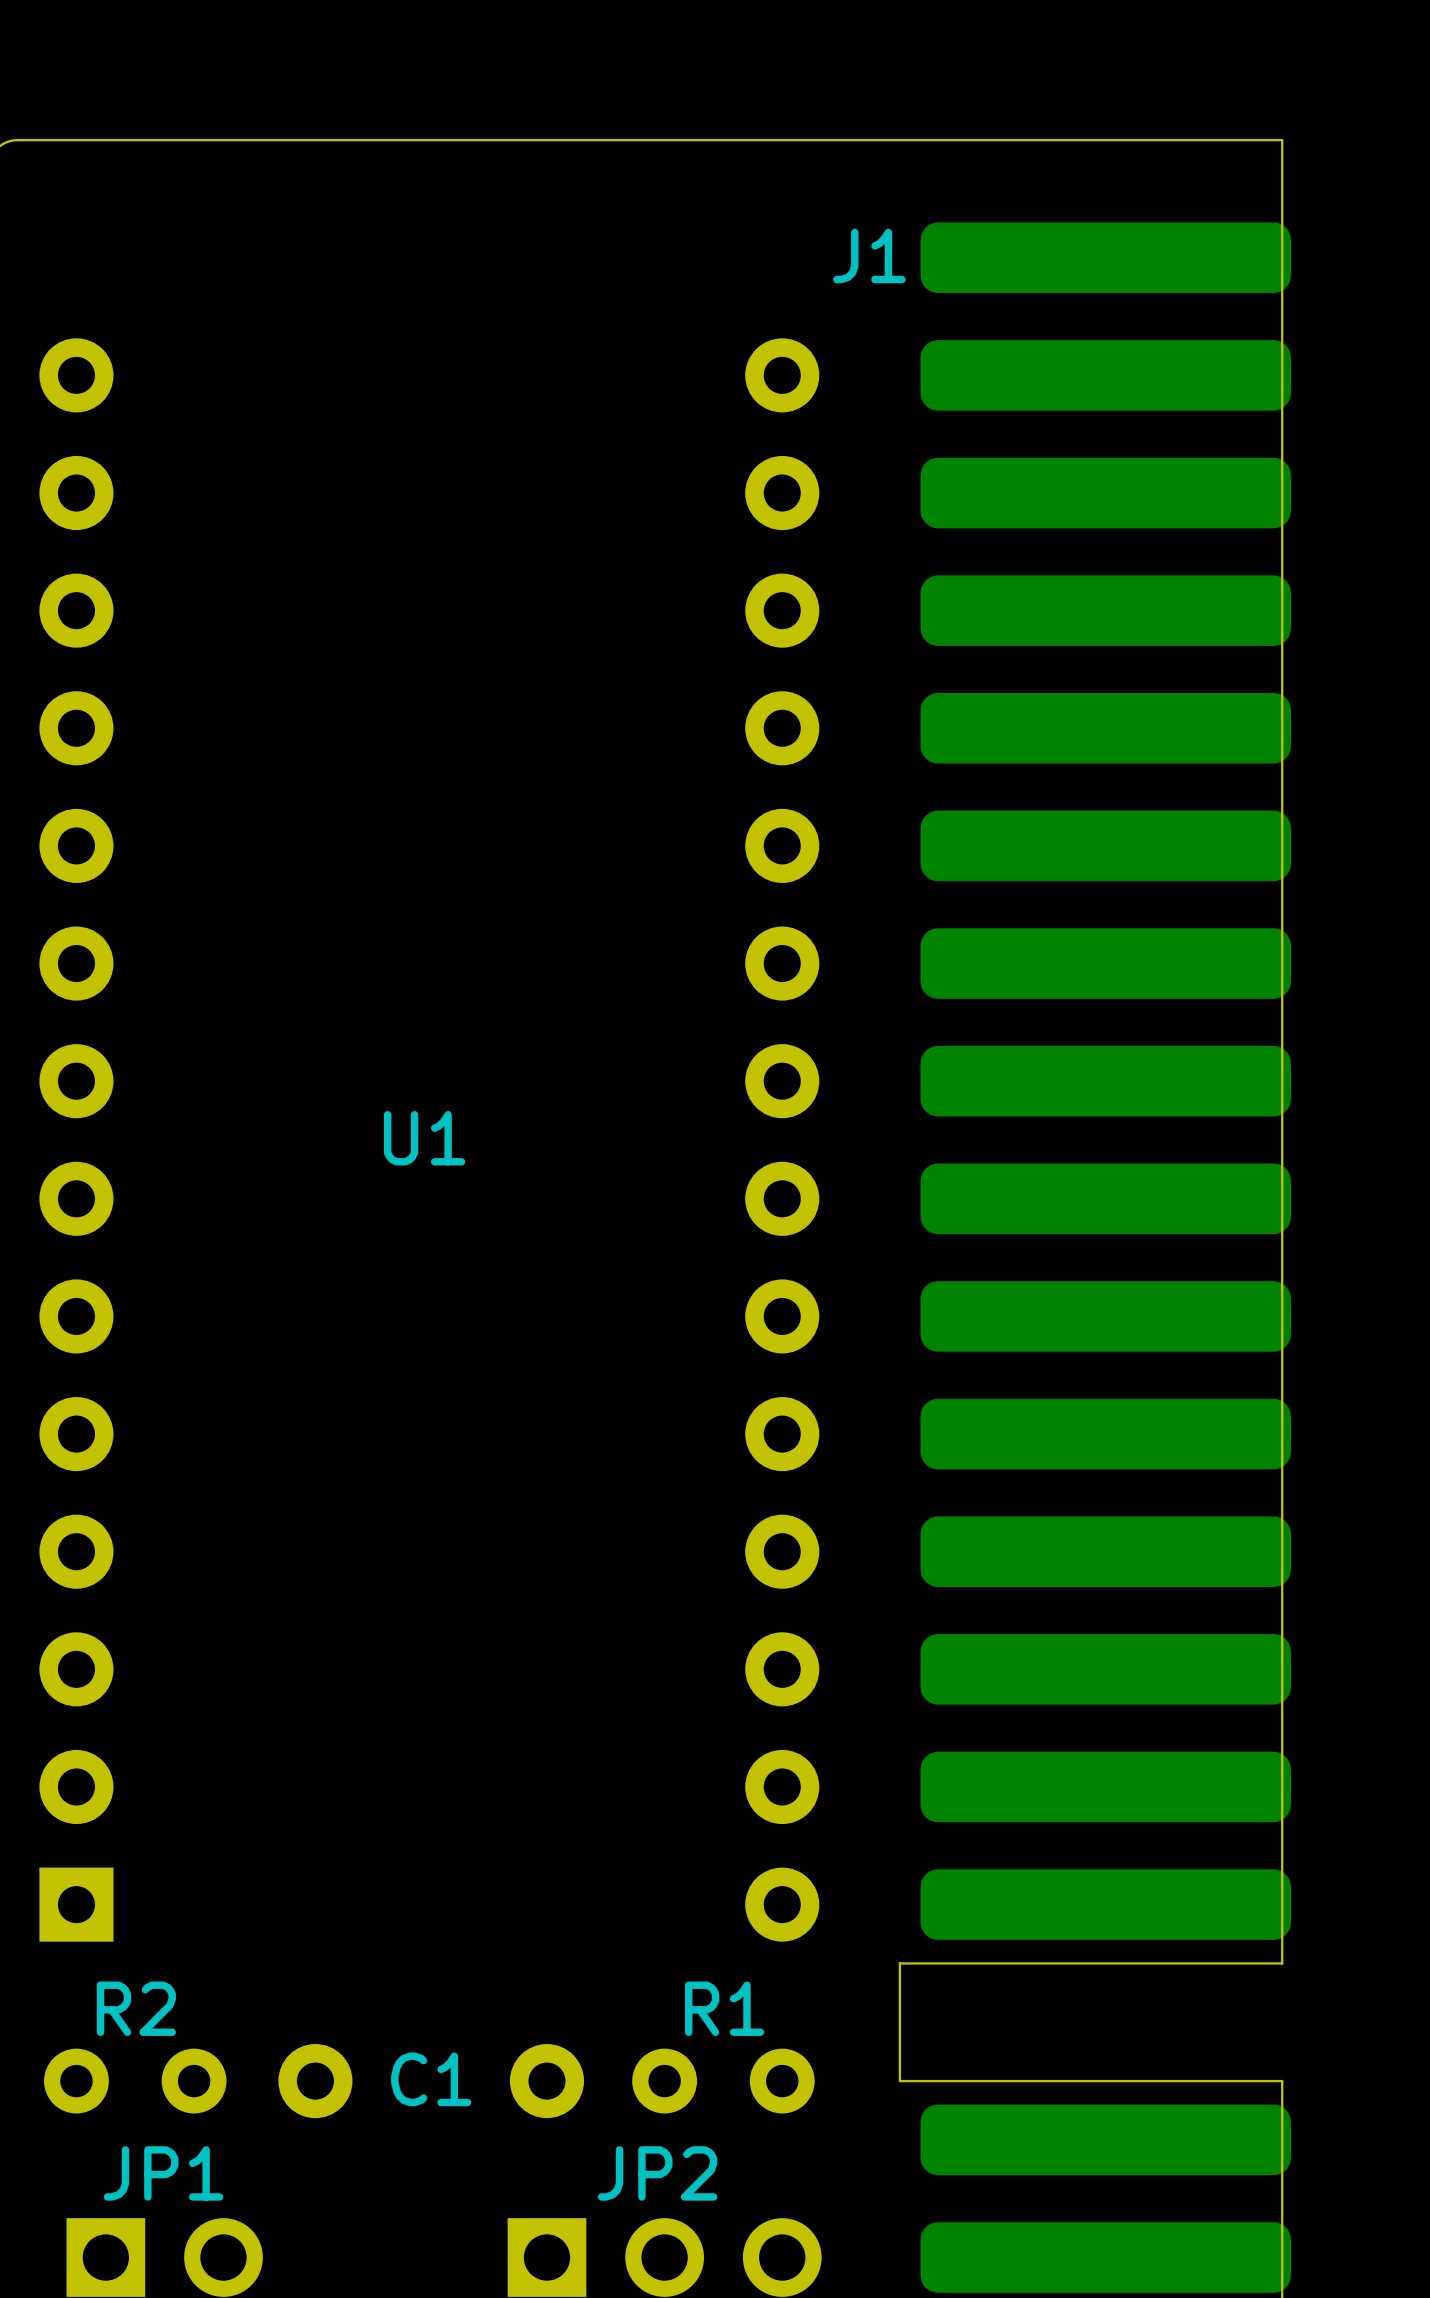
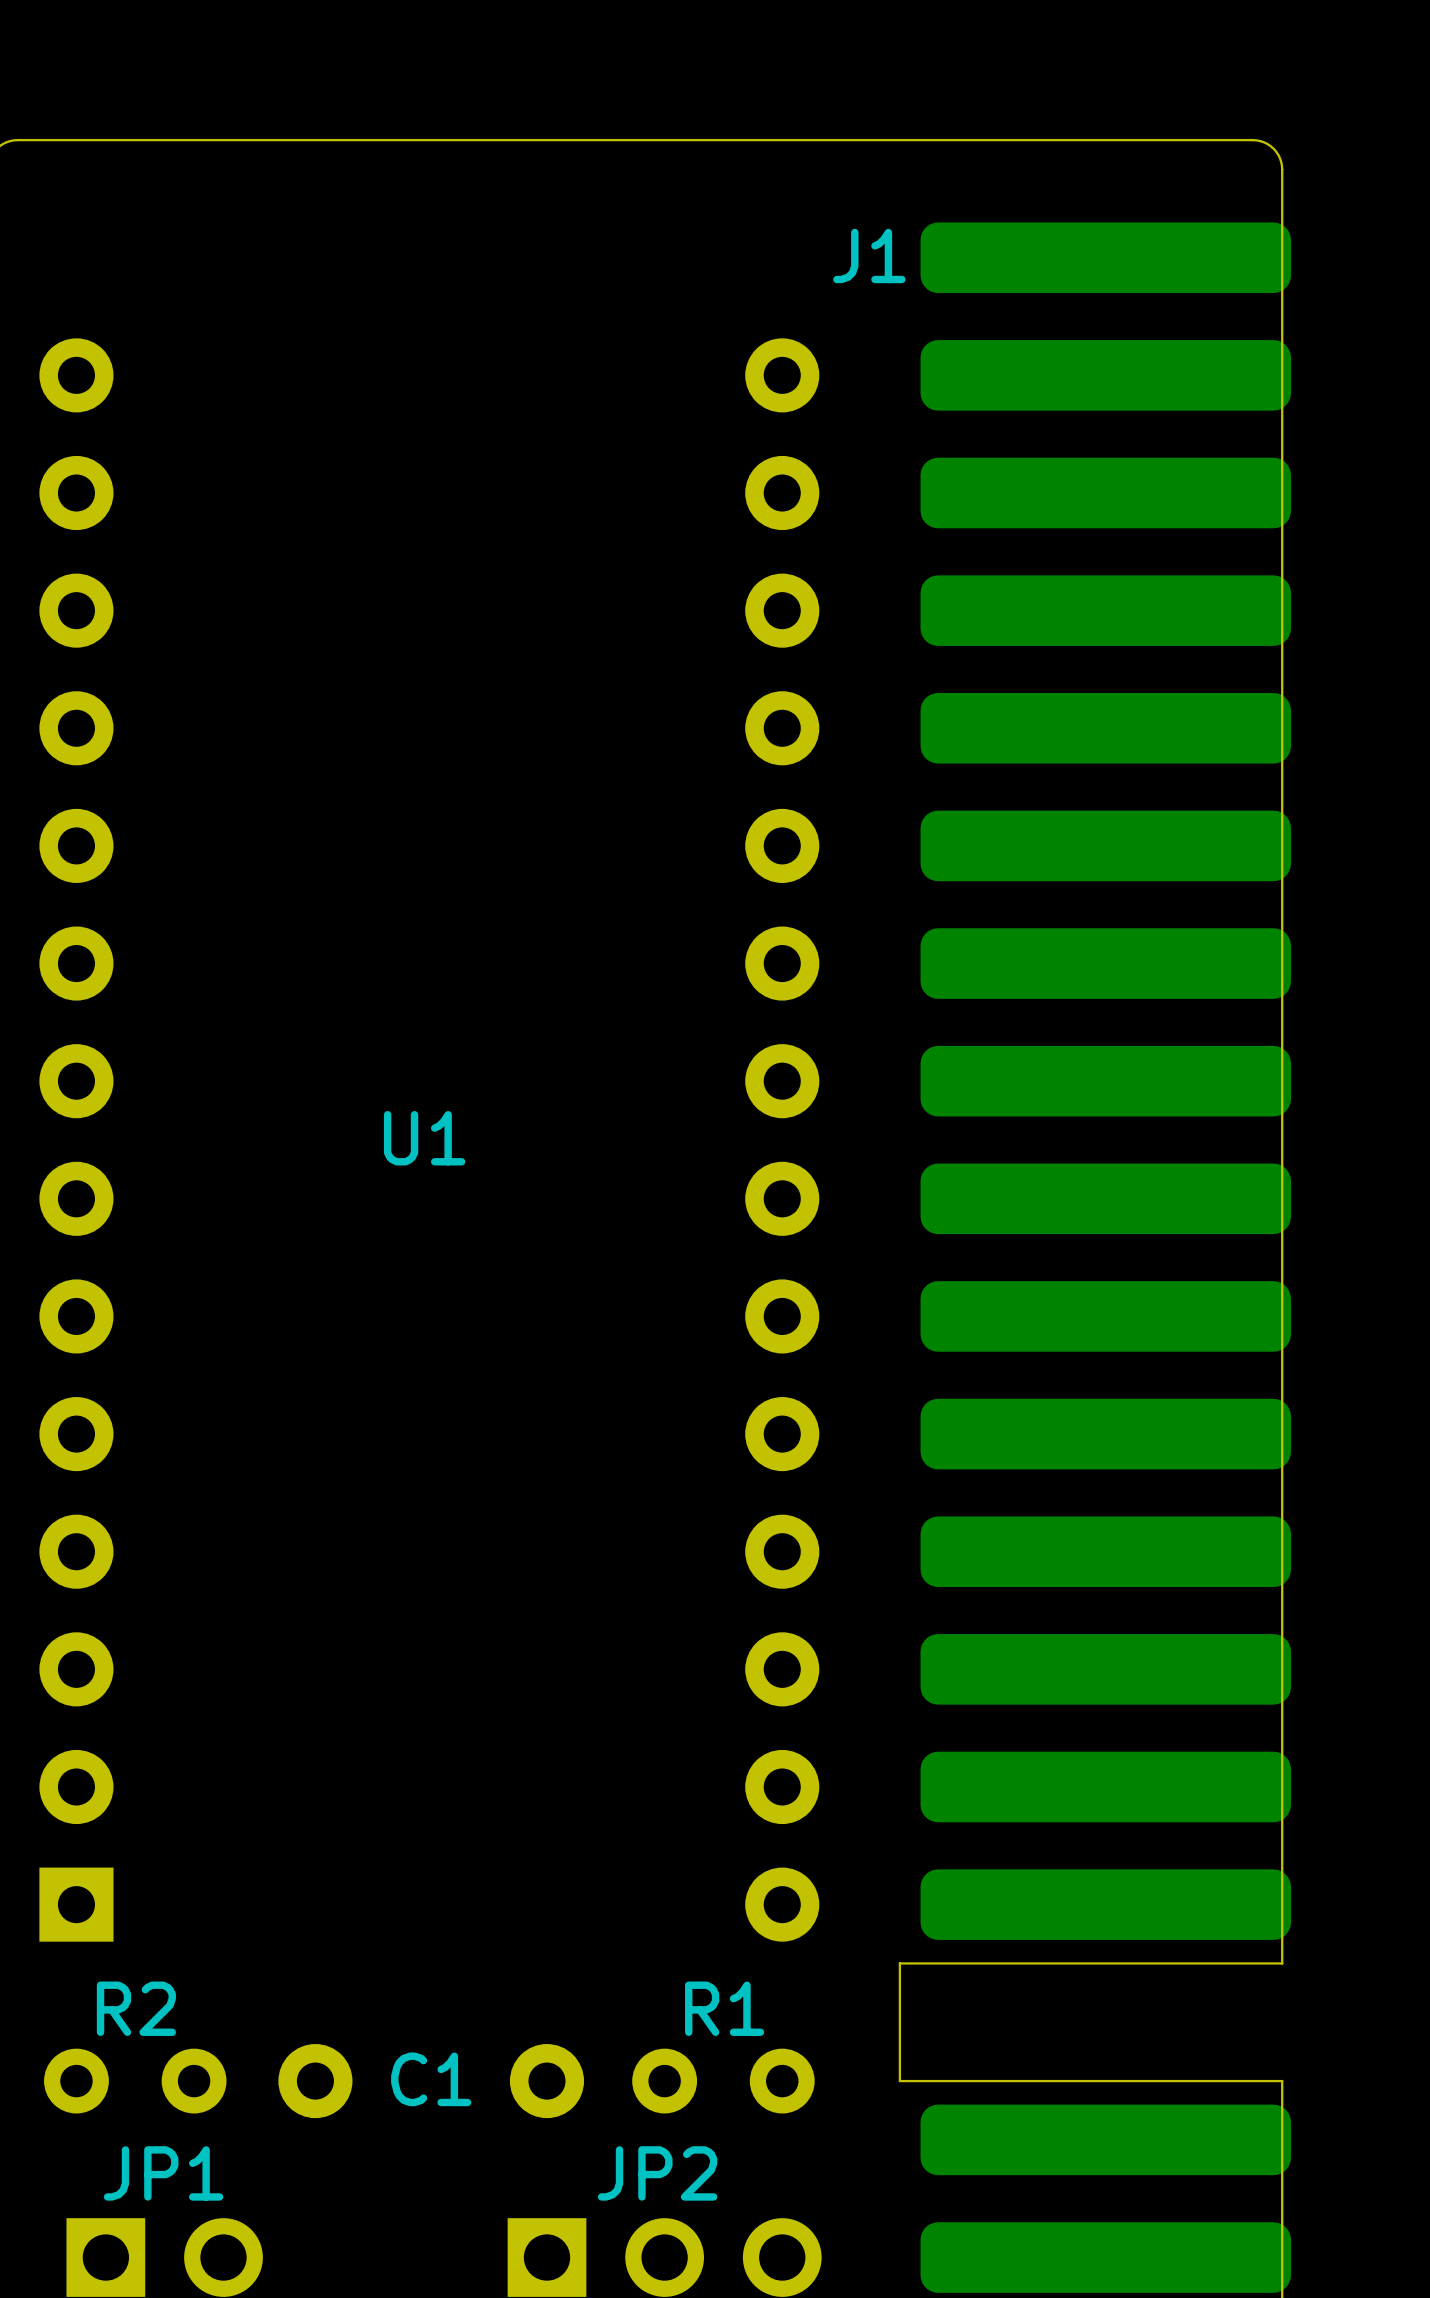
board edge: (1252, 140) (1282, 140) (1282, 169) -> (1252, 140) (1264, 142) (1273, 148) (1279, 158) (1282, 169)

